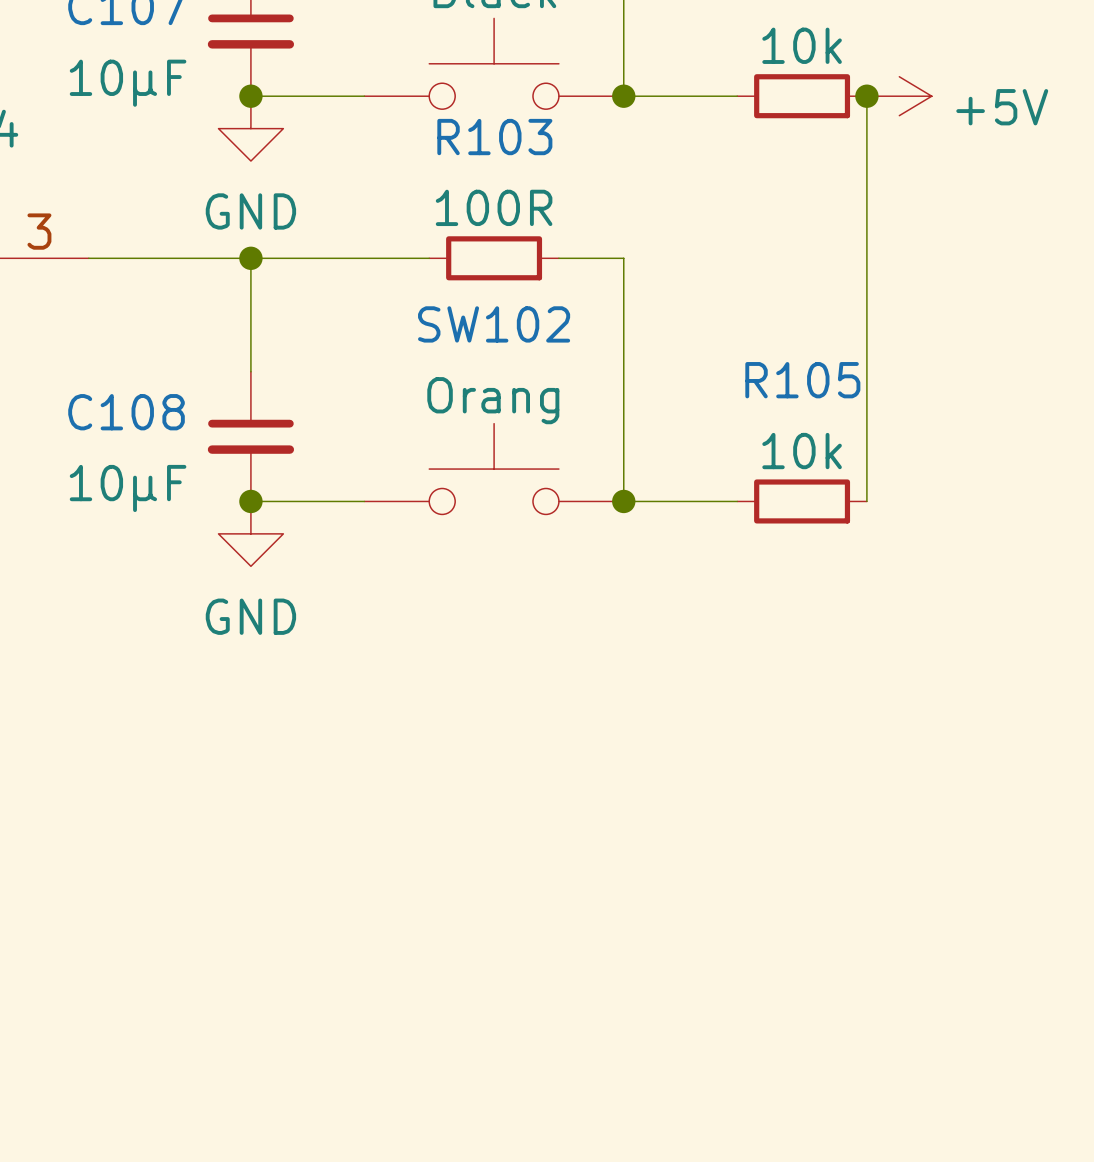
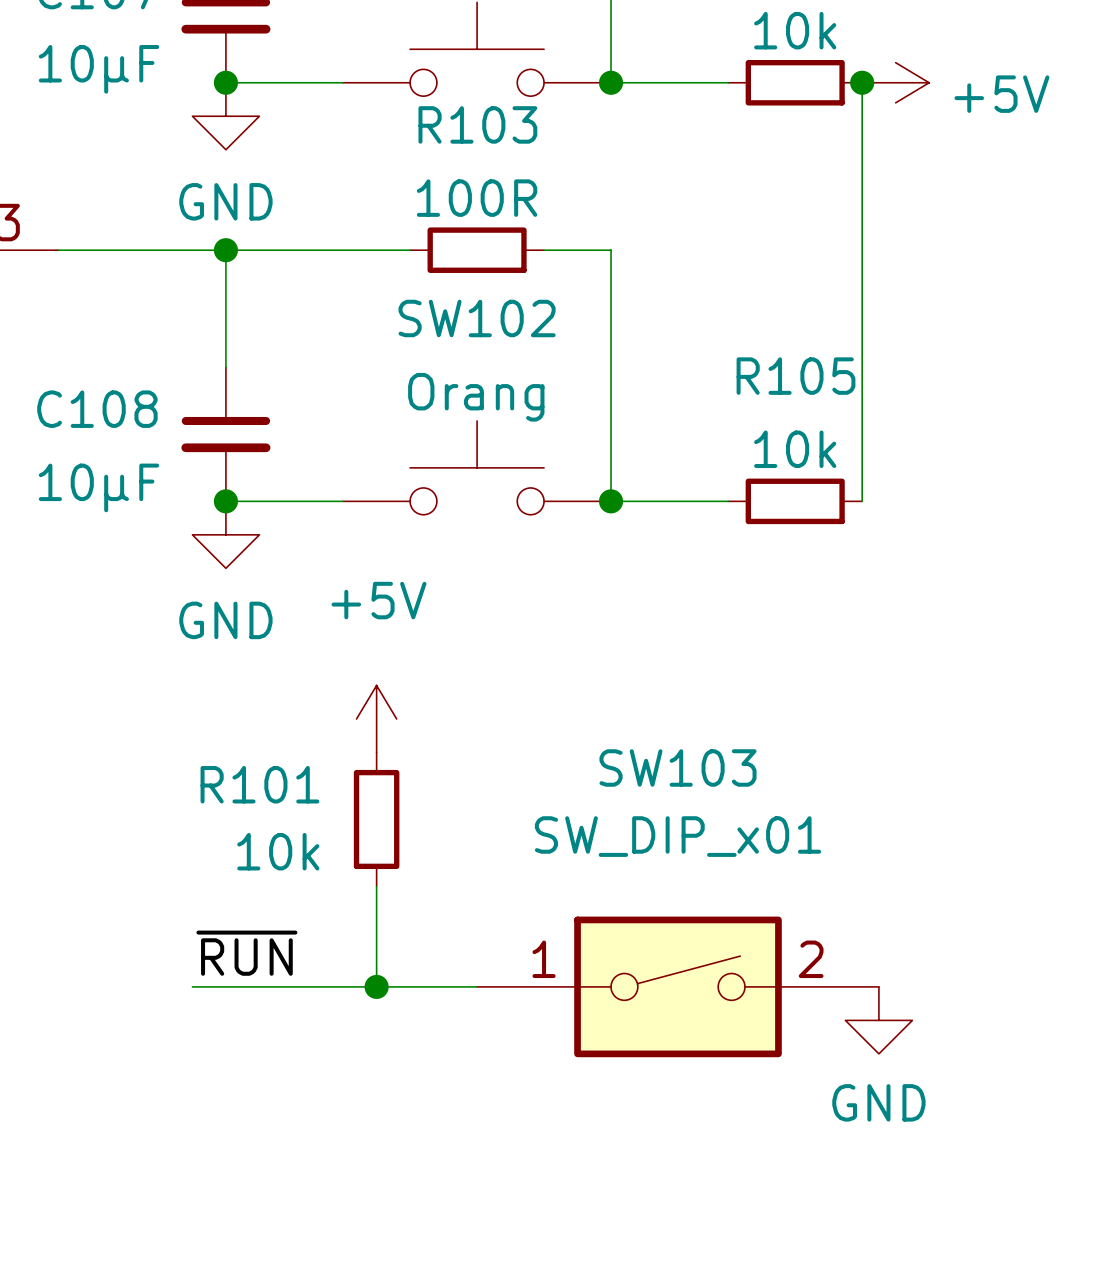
power symbol: none -> +5V (376, 719)
R101: none -> 10k (376, 819)
wire: none -> (376, 886) (376, 986)
label: none -> ~{RUN} (246, 953)
wire: none -> (192, 986) (477, 986)
junction: none -> (376, 986)
SW103: none -> SW_DIP_x01 (678, 986)
power symbol: none -> GND (878, 1020)

